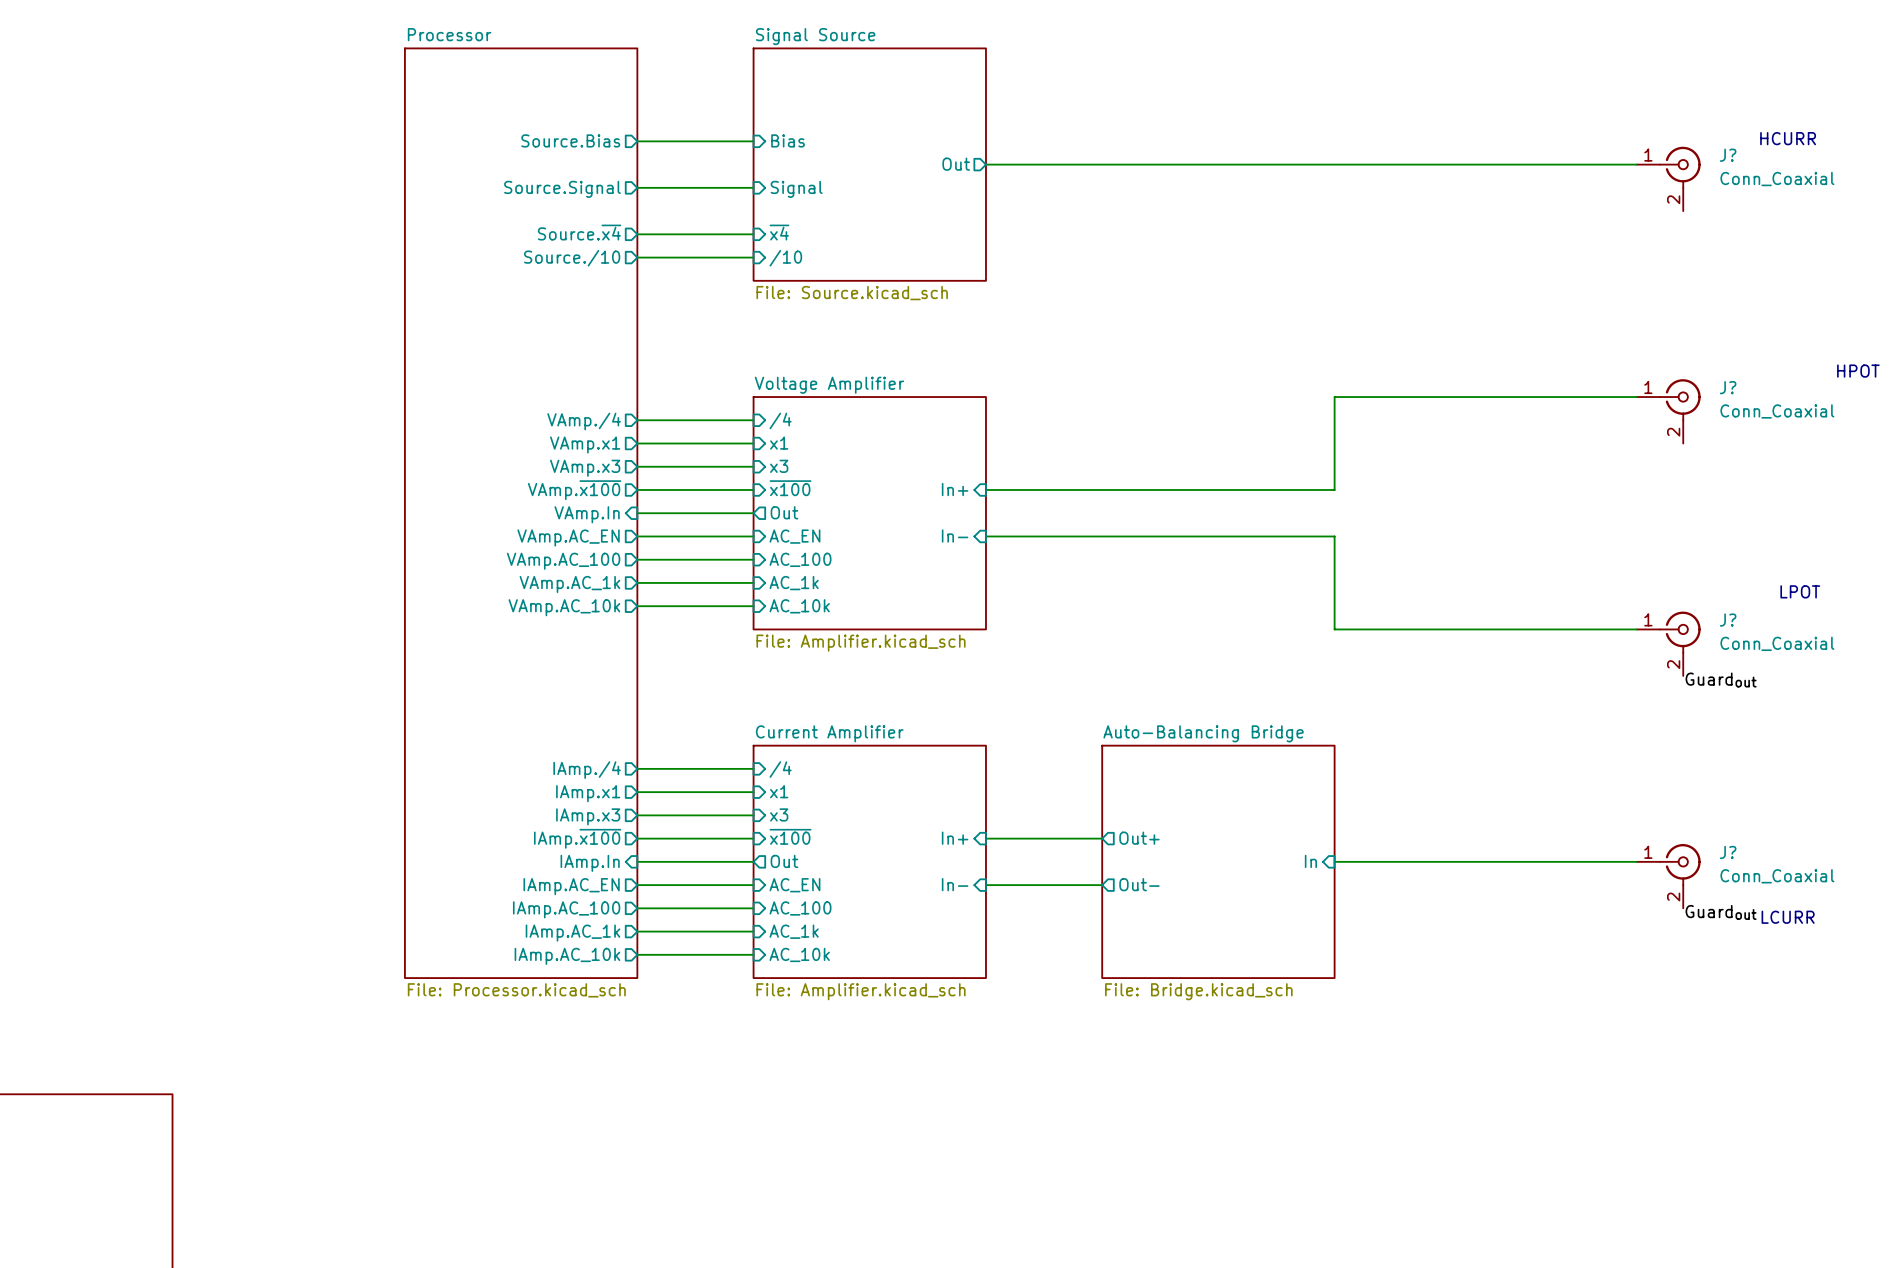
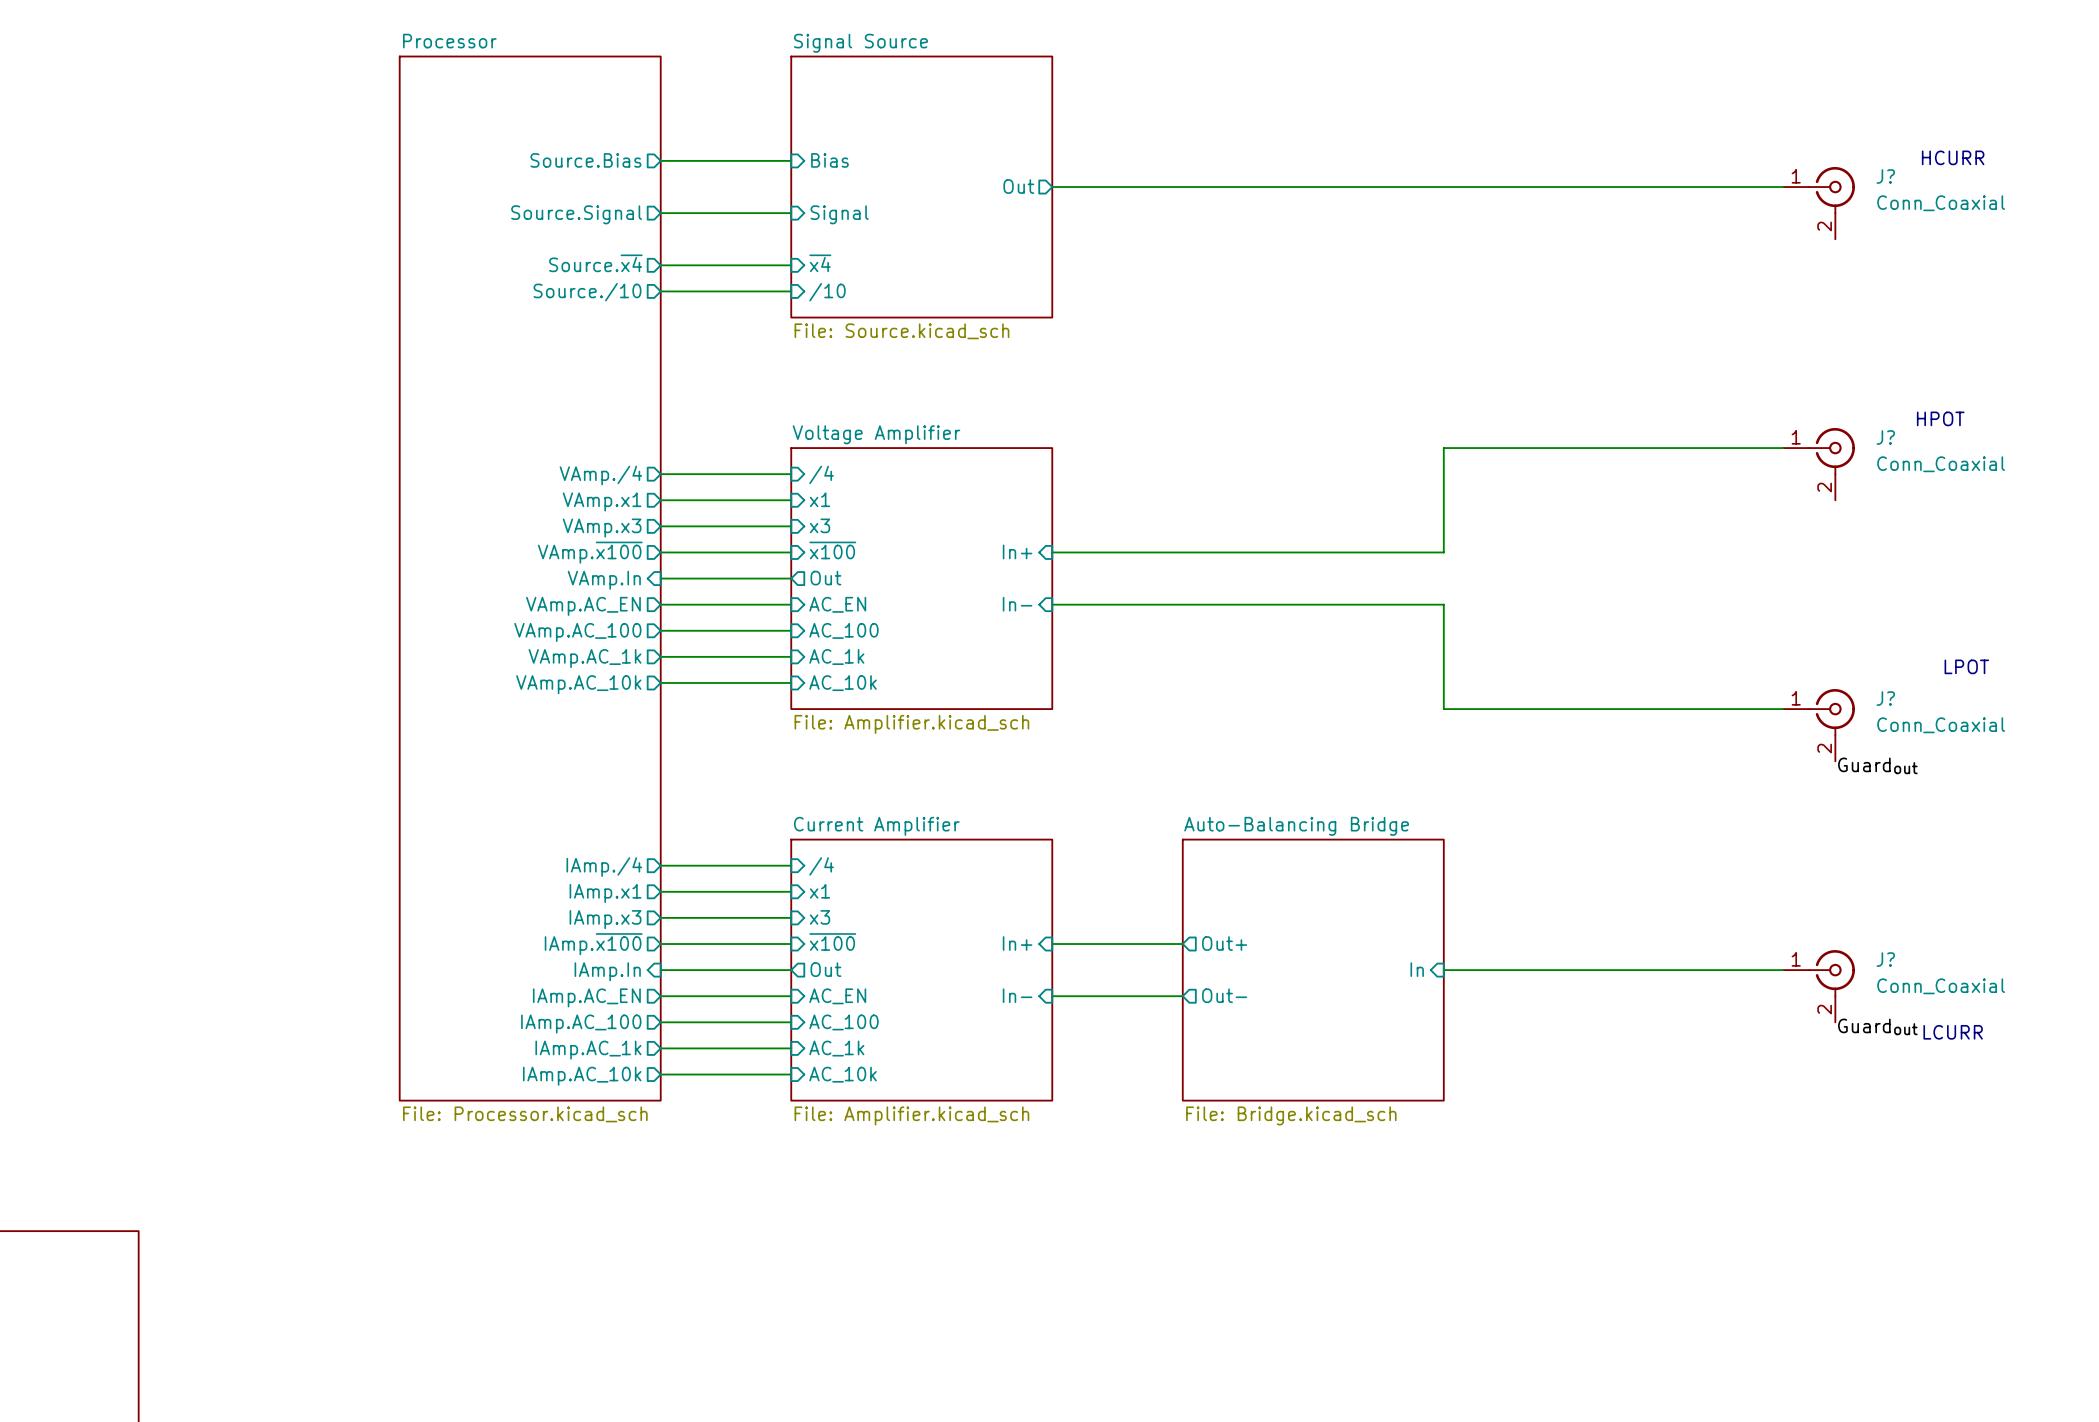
text position: HPOT (1858, 371) -> HPOT (1940, 418)

